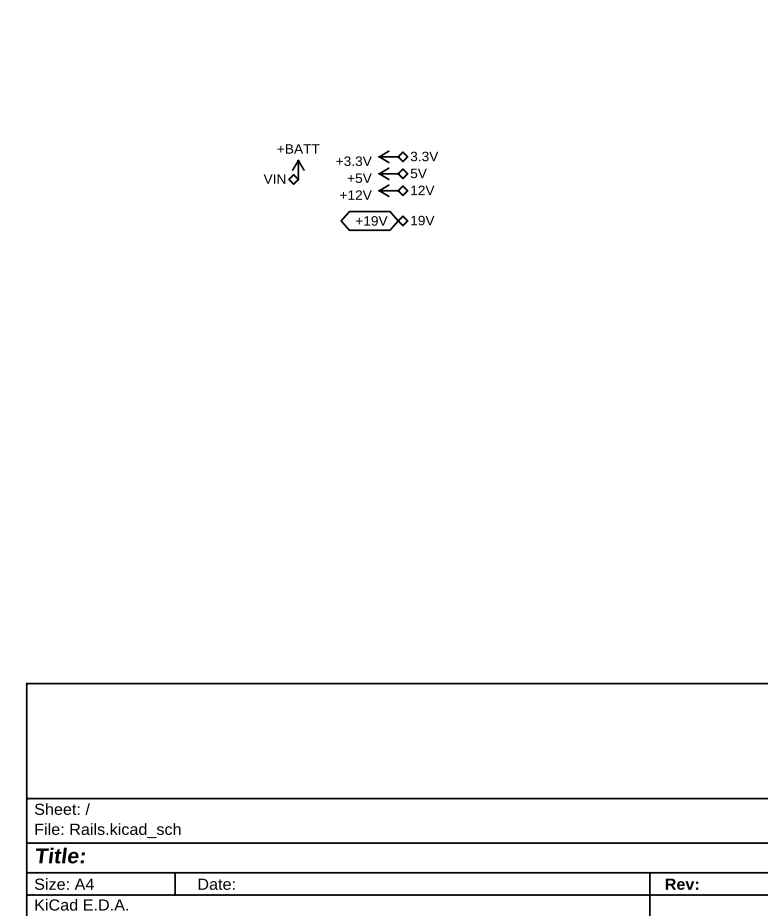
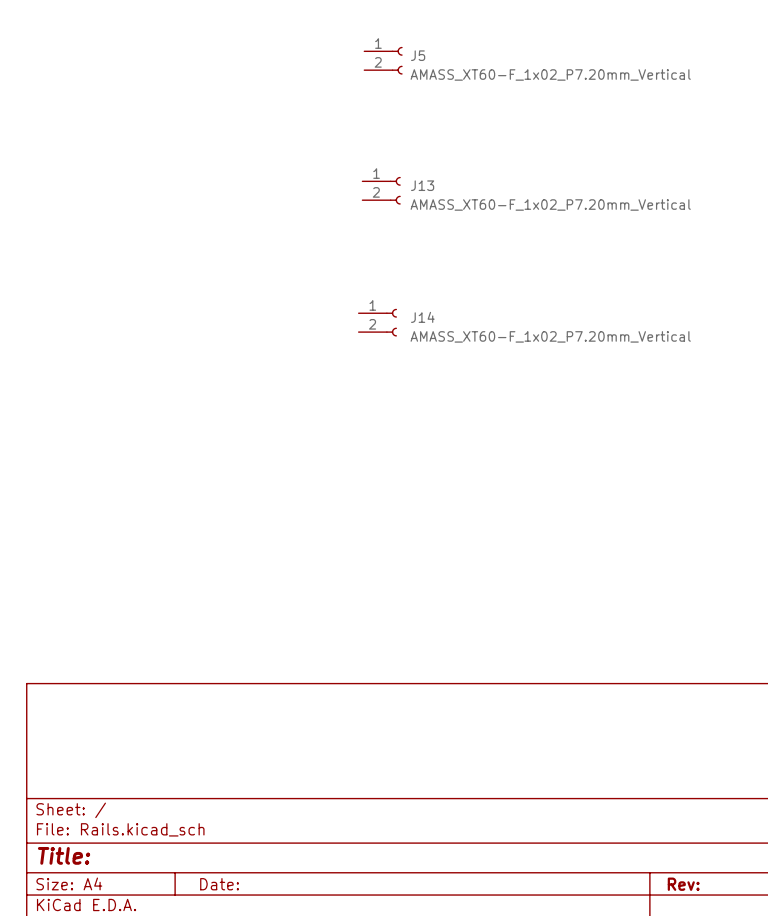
J5: none -> AMASS_XT60-F_1x02_P7.20mm_Vertical (383, 60)
power symbol: +3.3V (388, 156) -> none
hierarchical label: 3.3V (424, 156) -> none
power symbol: +BATT (298, 170) -> none
power symbol: +5V (388, 173) -> none
hierarchical label: 5V (418, 173) -> none
hierarchical label: VIN (274, 179) -> none
J13: none -> AMASS_XT60-F_1x02_P7.20mm_Vertical (381, 190)
power symbol: +12V (388, 190) -> none
hierarchical label: 12V (422, 190) -> none
global label: +19V (371, 220) -> none
hierarchical label: 19V (422, 220) -> none
J14: none -> AMASS_XT60-F_1x02_P7.20mm_Vertical (377, 322)

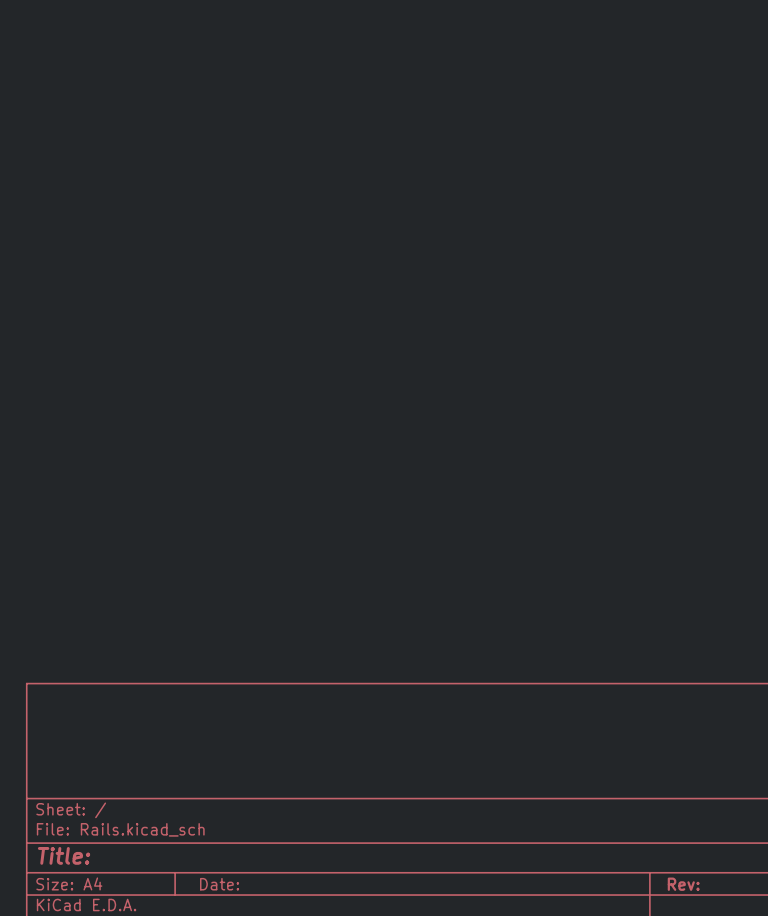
J5: AMASS_XT60-F_1x02_P7.20mm_Vertical (383, 60) -> none
J13: AMASS_XT60-F_1x02_P7.20mm_Vertical (381, 190) -> none
J14: AMASS_XT60-F_1x02_P7.20mm_Vertical (377, 322) -> none

